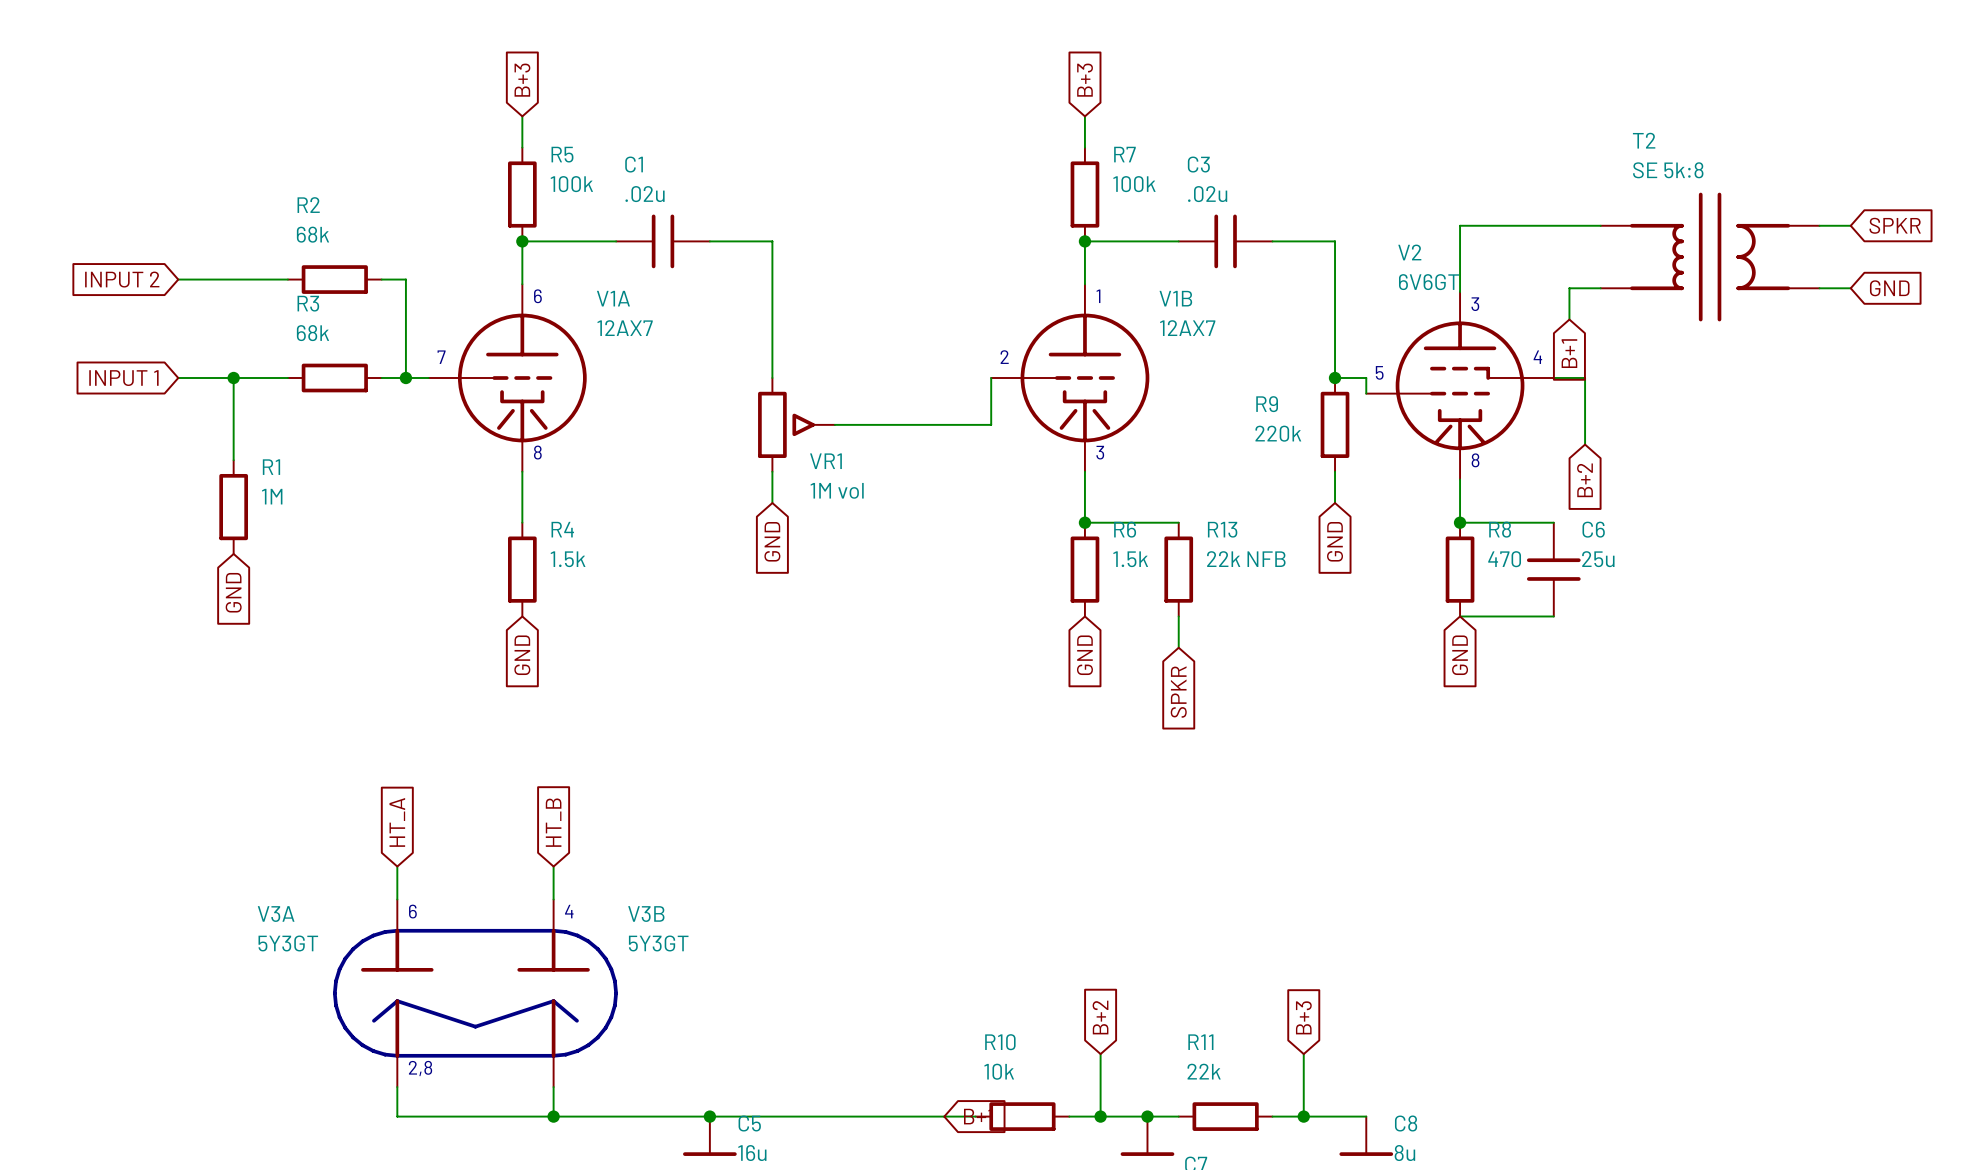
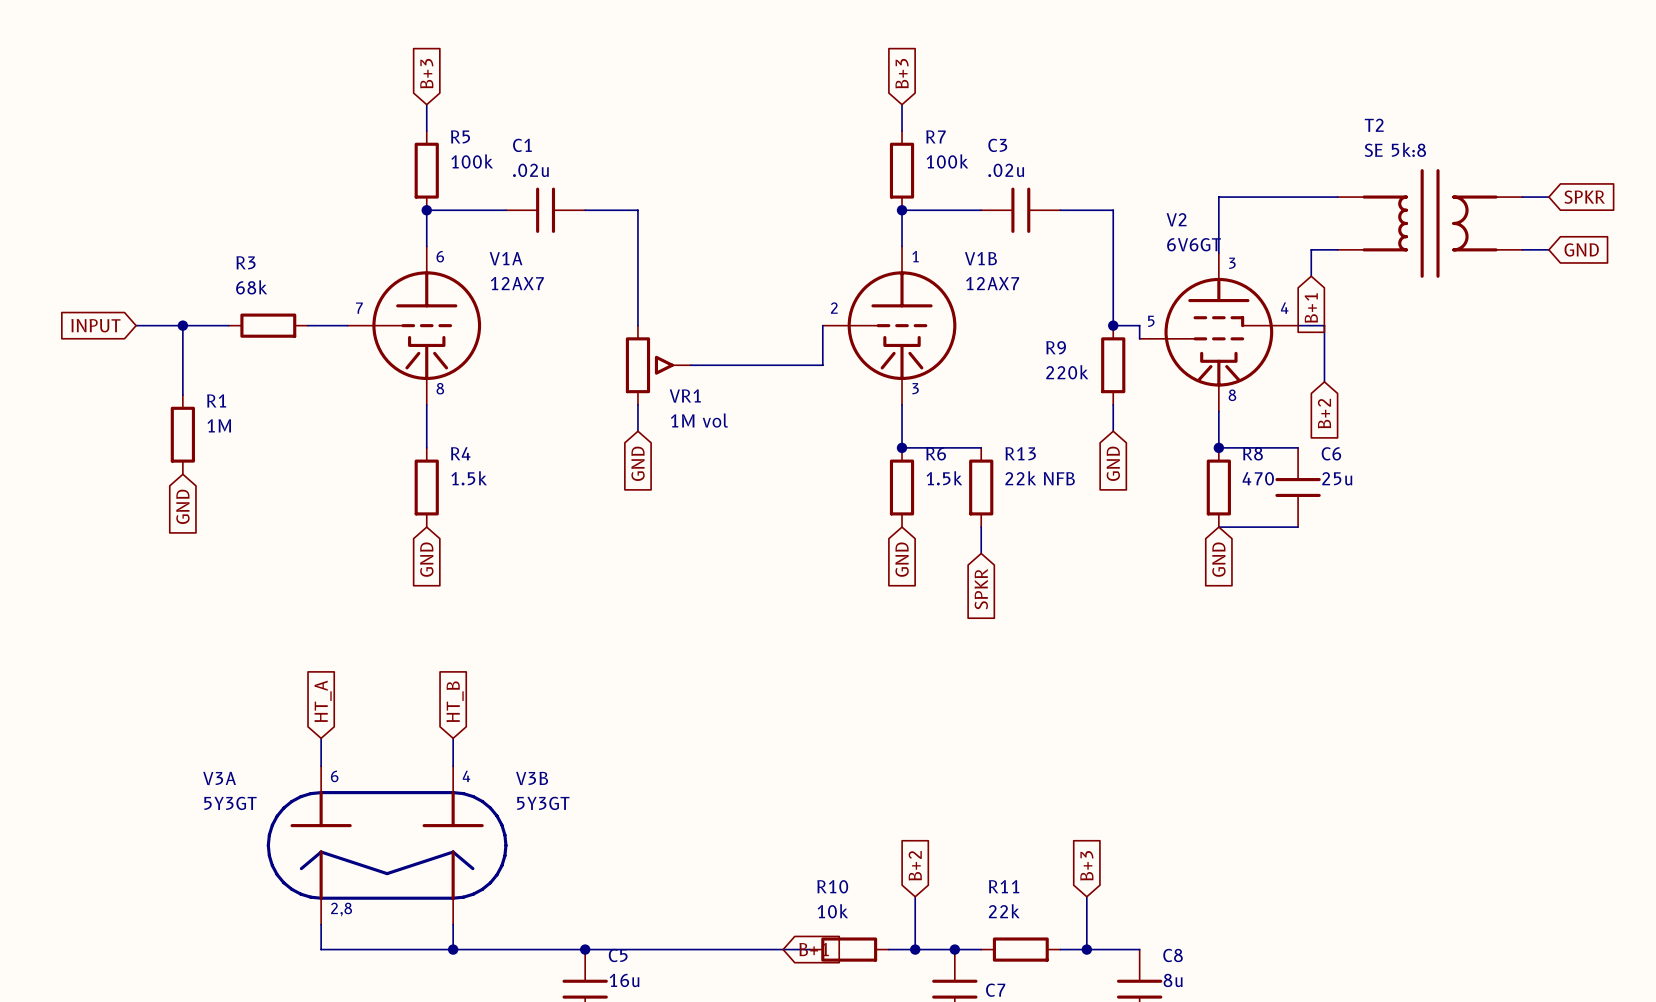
global label: INPUT 2 (122, 279) -> none
wire: (178, 279) (287, 279) -> none
R2: 68k (334, 279) -> none
wire: (381, 279) (405, 279) (405, 378) -> none
global label: INPUT 1 (123, 378) -> INPUT (95, 325)
junction: (405, 378) -> none

